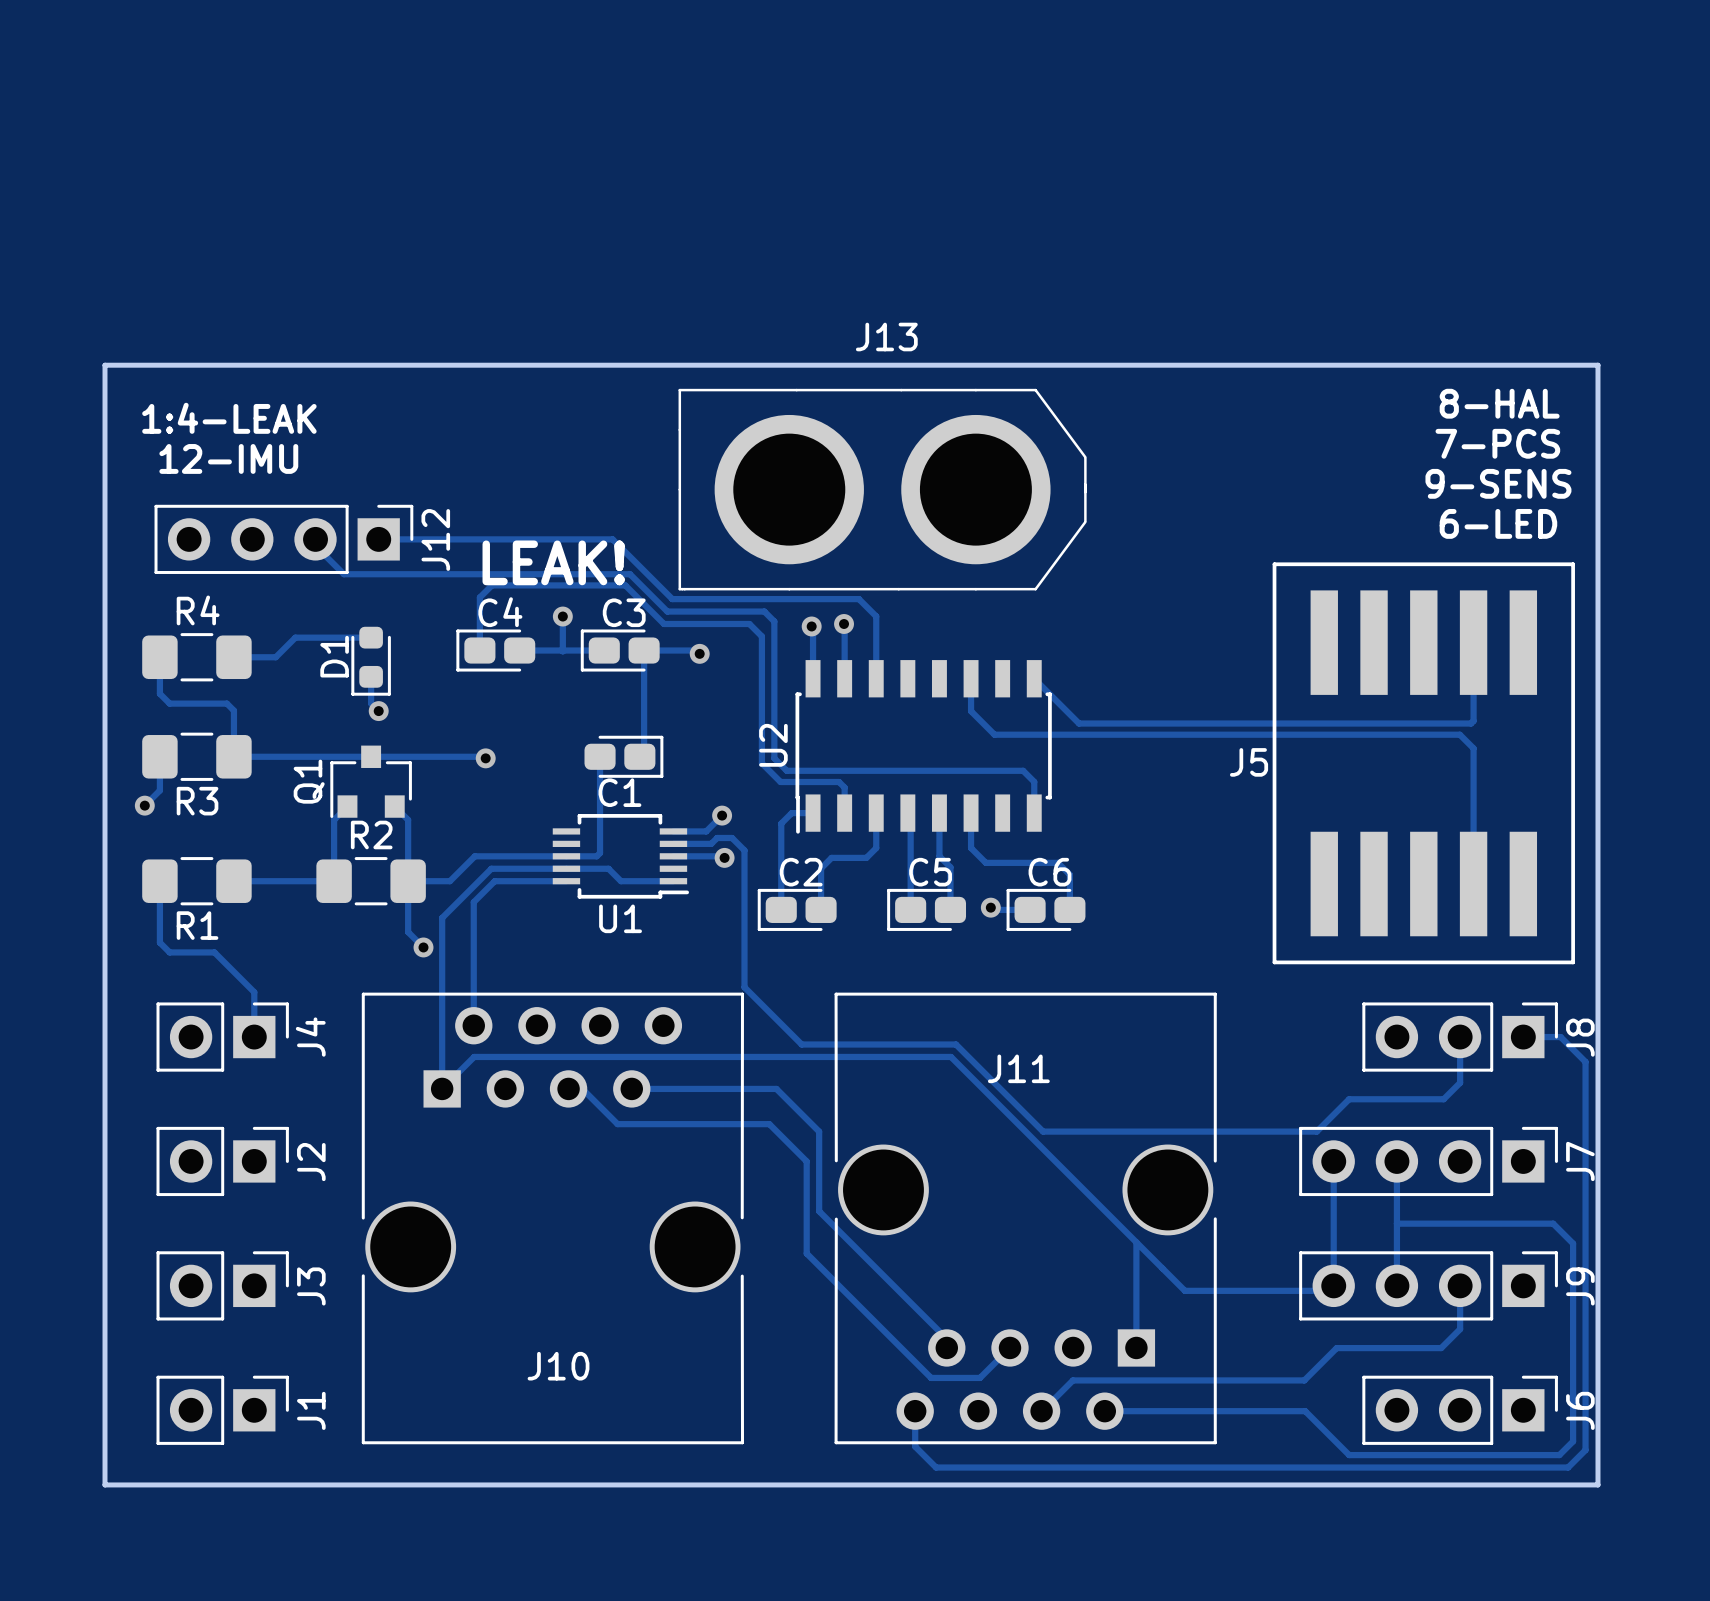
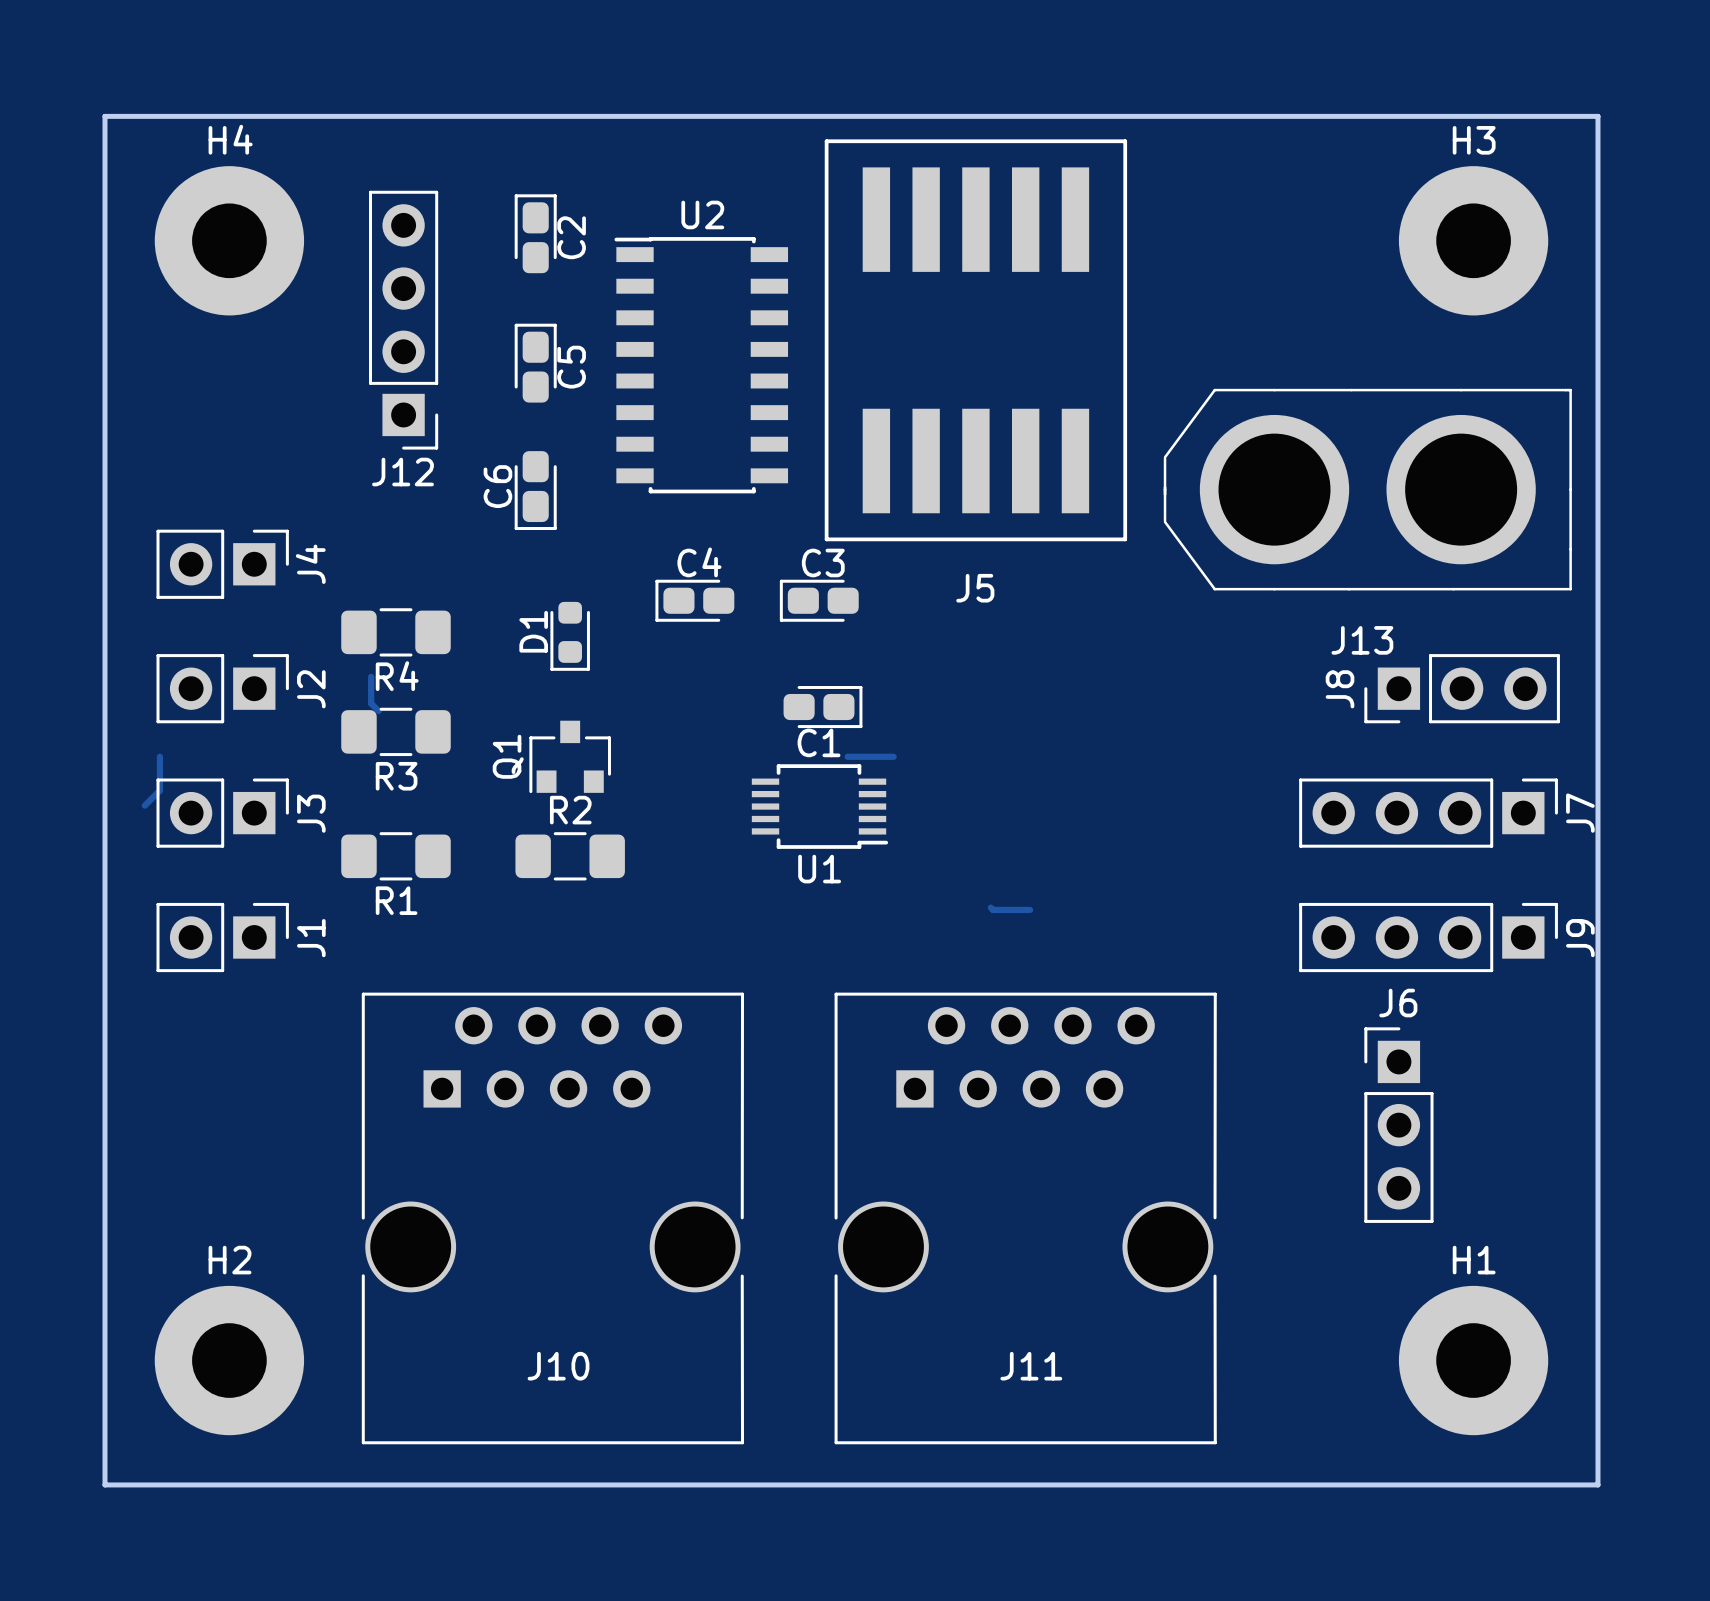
H4: none -> (229, 240)
H3: none -> (1473, 240)
board edge: (105, 365) (1597, 365) -> (105, 365) (105, 116) (1597, 116) (1597, 365)
text: 8-HAL (1499, 403) -> none
text: 1:4-LEAK (229, 418) -> none
text: 7-PCS (1497, 443) -> none
text: 12-IMU (228, 458) -> none
text: 9-SENS (1498, 483) -> none
J13 rotation: 0° (882, 489) -> 180° (1367, 489)
J13 position: (882, 489) -> (1367, 489)
text: 6-LED (1498, 523) -> none
J12 rotation: 0° (283, 539) -> 90° clockwise (403, 320)
J12 position: (283, 539) -> (403, 320)
track: (315, 539) (315, 545) (343, 574) (630, 574) (667, 611) (764, 611) (774, 621) (774, 758) (786, 770) (1023, 770) (1034, 781) (1034, 813) -> none
track: (378, 539) (612, 539) (672, 599) (858, 599) (876, 616) (876, 678) -> none
text: LEAK! (553, 562) -> none
R4 name position: R4 (198, 610) -> R4 (397, 676)
track: (562, 616) (562, 651) -> none
via: (562, 616) -> none
track: (844, 623) (844, 678) -> none
via: (844, 623) -> none
track: (811, 626) (813, 678) -> none
via: (811, 626) -> none
track: (371, 637) (295, 637) (275, 657) (233, 657) -> none
track: (1473, 642) (1473, 721) (1471, 723) (1079, 723) (1034, 678) -> none
track: (479, 650) (479, 597) (491, 585) (625, 585) (663, 623) (749, 623) (761, 636) (761, 763) (780, 782) (839, 782) (844, 787) (844, 813) -> none
C4 position: (495, 650) -> (694, 600)
track: (519, 650) (604, 650) -> none
C3 position: (620, 650) -> (819, 600)
track: (699, 653) (696, 650) (644, 650) (644, 752) (639, 756) -> none
via: (699, 653) -> none
track: (159, 657) (159, 693) (169, 703) (226, 703) (233, 710) (233, 756) (484, 756) (485, 758) -> none
R4 position: (196, 657) -> (396, 632)
D1 position: (371, 661) -> (570, 636)
track: (971, 678) (971, 711) (994, 734) (1459, 734) (1473, 748) (1473, 884) -> none
via: (378, 711) -> none
U2 rotation: 0° (923, 746) -> 90° clockwise (701, 365)
U2 position: (923, 746) -> (701, 365)
R3 position: (196, 756) -> (396, 731)
track: (600, 756) (600, 853) (596, 856) (474, 856) (449, 881) (408, 881) -> none
C1 position: (623, 756) -> (822, 707)
track: none -> (847, 756) (893, 756)
via: (485, 758) -> none
J5 name position: J5 (1249, 762) -> J5 (975, 588)
J5 position: (1423, 763) -> (975, 340)
Q1 position: (371, 781) -> (570, 756)
via: (144, 805) -> none
track: (347, 806) (334, 819) (334, 881) (233, 881) -> none
track: (394, 806) (408, 819) (408, 932) (423, 947) -> none
track: (813, 813) (791, 813) (781, 823) (781, 909) -> none
track: (876, 813) (876, 848) (866, 857) (831, 857) (821, 868) (821, 909) -> none
track: (907, 813) (910, 815) (910, 909) -> none
track: (939, 813) (939, 856) (950, 867) (950, 909) -> none
track: (971, 813) (971, 848) (985, 862) (1058, 862) (1069, 874) (1069, 909) -> none
track: (722, 815) (706, 831) (673, 831) -> none
via: (722, 815) -> none
track: (673, 843) (711, 843) (717, 837) (732, 837) (744, 850) (744, 987) (801, 1044) (956, 1044) (1043, 1131) (1316, 1131) (1349, 1099) (1443, 1099) (1460, 1082) (1460, 1037) -> none
U1 position: (620, 856) -> (819, 806)
track: (673, 856) (723, 856) -> none
via: (724, 857) -> none
track: (159, 881) (159, 942) (169, 952) (214, 952) (254, 992) (254, 1037) -> none
R1 position: (196, 881) -> (396, 856)
R2 position: (371, 881) -> (570, 856)
track: (566, 881) (494, 881) (473, 902) (473, 1025) -> none
track: (673, 881) (620, 881) (608, 868) (491, 868) (442, 917) (442, 1088) (474, 1056) (951, 1056) (1184, 1290) (1328, 1290) (1333, 1285) (1333, 1161) -> none
via: (990, 907) -> none
C2 rotation: 0° (797, 909) -> 90° clockwise (535, 233)
C2 position: (797, 909) -> (535, 233)
C5 rotation: 0° (926, 909) -> 90° clockwise (535, 363)
C5 position: (926, 909) -> (535, 363)
C6 rotation: 0° (1046, 909) -> 90° counterclockwise (535, 490)
C6 position: (1046, 909) -> (535, 490)
via: (423, 947) -> none
J4 position: (222, 1037) -> (222, 564)
J8 rotation: 0° (1460, 1037) -> 180° (1462, 688)
J8 position: (1460, 1037) -> (1462, 688)
track: (1523, 1037) (1560, 1037) (1585, 1061) (1585, 1450) (1568, 1467) (936, 1467) (915, 1446) (915, 1411) -> none
track: (568, 1088) (582, 1088) (617, 1124) (769, 1124) (806, 1161) (806, 1253) (931, 1377) (980, 1377) (1010, 1347) -> none
track: (631, 1088) (776, 1088) (819, 1131) (819, 1211) (946, 1338) (946, 1347) -> none
J2 position: (222, 1161) -> (222, 688)
track: (1396, 1161) (1396, 1285) -> none
J7 position: (1428, 1161) -> (1428, 813)
J11 rotation: 0° (1025, 1218) -> 180° (1025, 1218)
track: (1396, 1223) (1553, 1223) (1573, 1243) (1573, 1441) (1559, 1455) (1349, 1455) (1305, 1411) (1104, 1411) -> none
track: (1136, 1242) (1136, 1347) -> none
J3 position: (222, 1285) -> (222, 813)
J9 position: (1428, 1285) -> (1428, 937)
track: (1460, 1285) (1460, 1329) (1441, 1348) (1336, 1348) (1304, 1380) (1072, 1380) (1041, 1411) -> none
H2: none -> (229, 1360)
H1: none -> (1473, 1360)
J1 position: (222, 1410) -> (222, 937)
J6 rotation: 0° (1460, 1410) -> 90° counterclockwise (1398, 1125)
J6 position: (1460, 1410) -> (1398, 1125)

